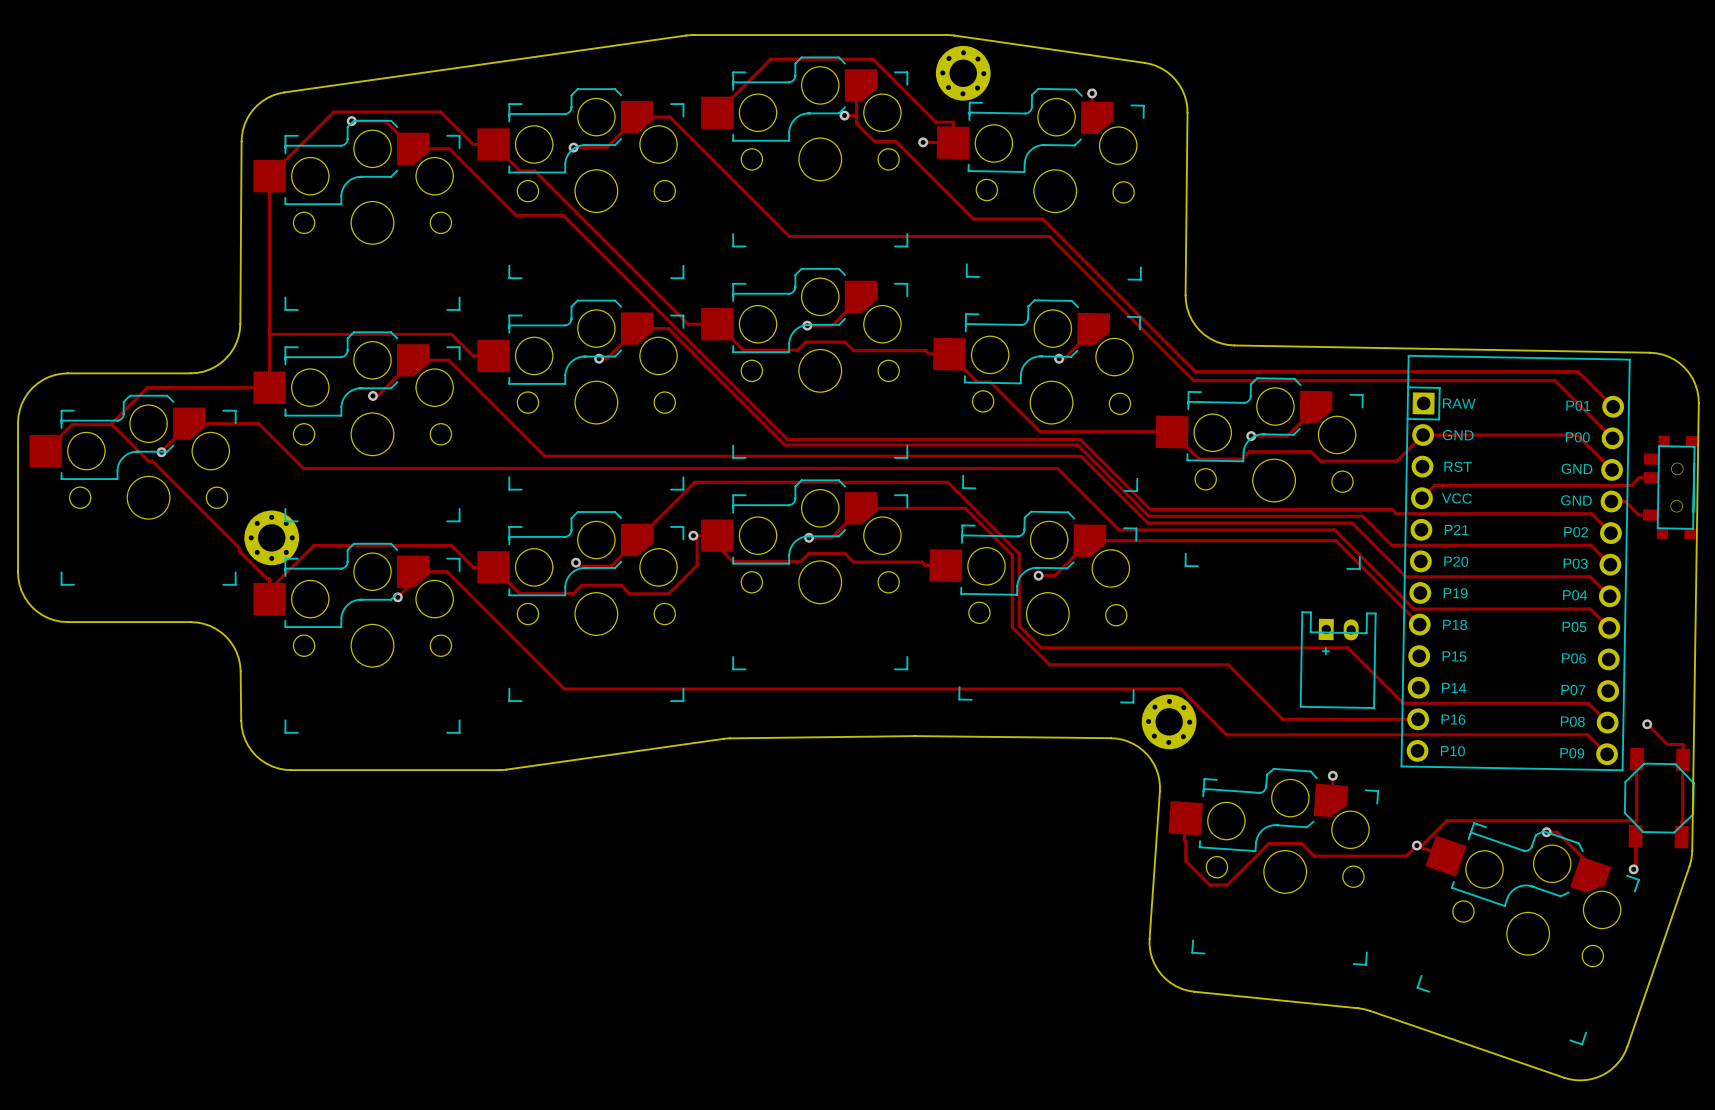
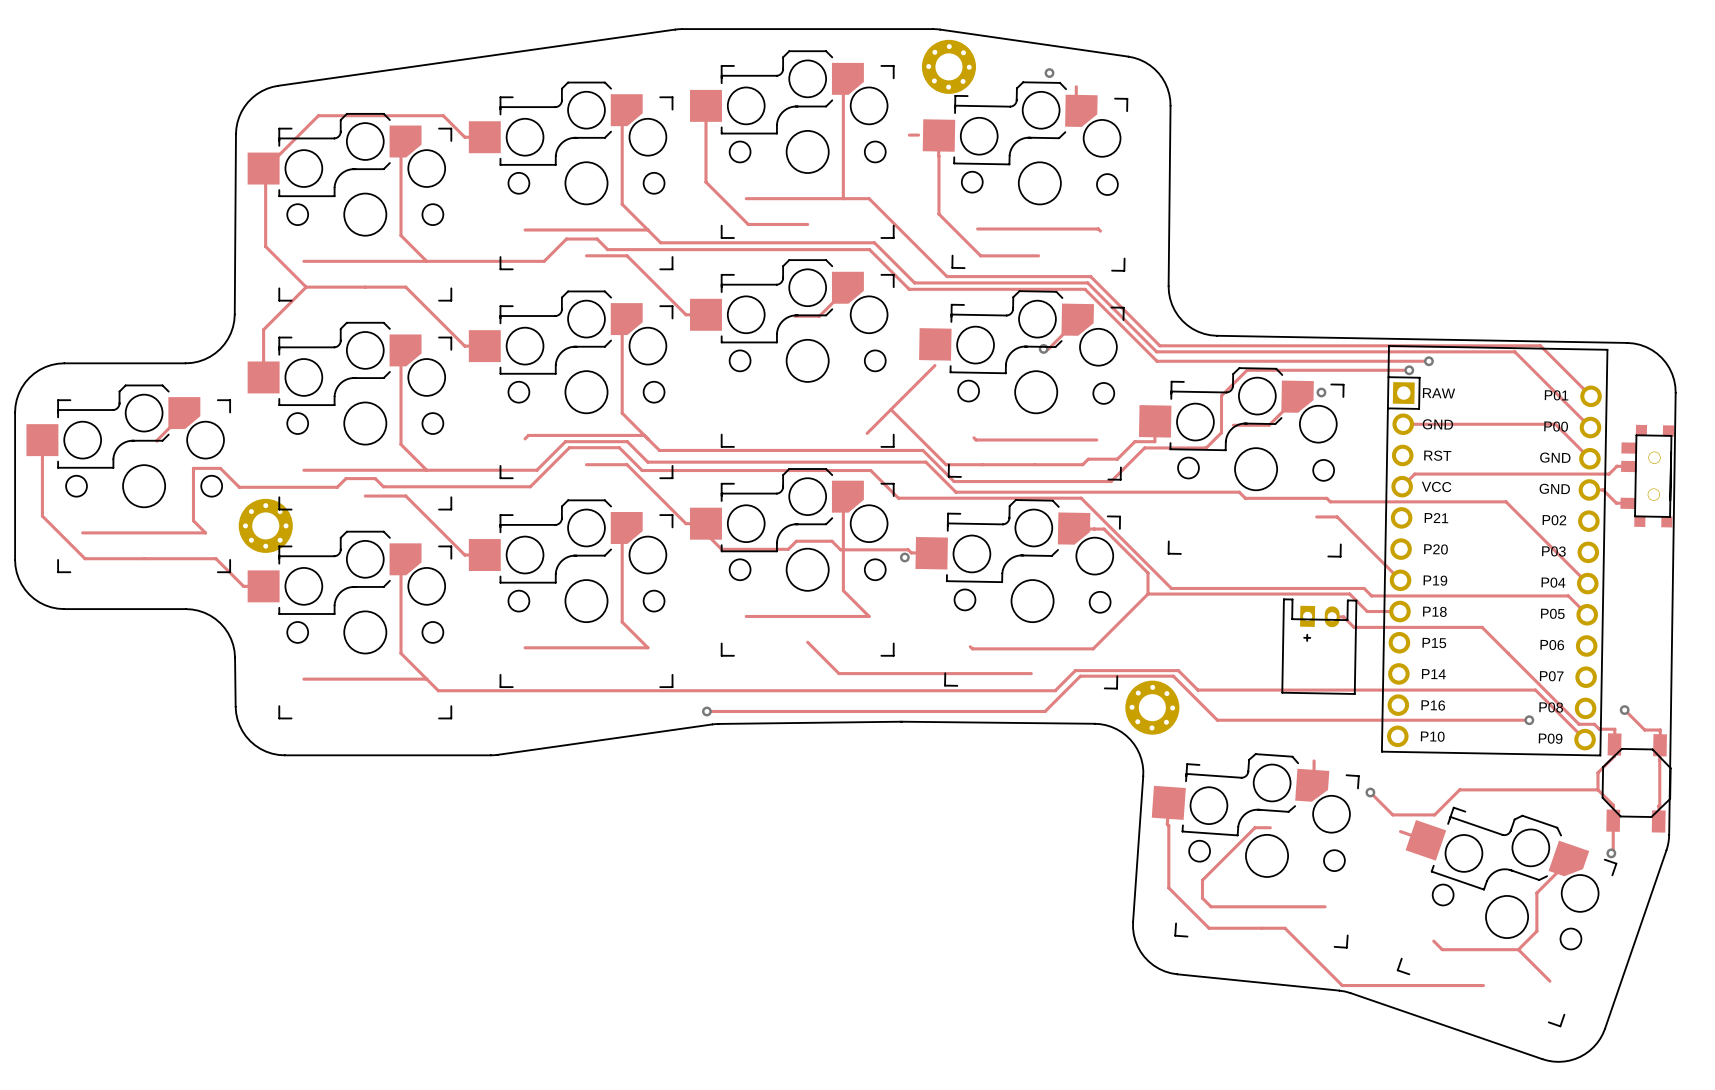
track: (856, 89) (856, 123) (874, 141) (895, 141) (973, 219) (1042, 219) (1195, 371) (1578, 371) -> (746, 198) (869, 198) (947, 276) (1090, 276) (1159, 345) (1540, 345) (1556, 361)
track: none -> (843, 83) (843, 198)
via position: (1092, 93) -> (1049, 73)
track: (717, 112) (770, 59) (873, 59) (936, 122) (953, 122) (953, 142) (932, 142) -> (705, 105) (705, 182) (748, 224) (807, 224)
track: (844, 115) (856, 115) -> none
via: (844, 115) -> none
track: (637, 117) (670, 117) (789, 236) (1049, 236) (1193, 380) (1554, 380) -> (622, 114) (622, 204) (660, 242) (874, 242) (914, 282) (1087, 282) (1156, 351) (1514, 351) (1533, 370)
track: (351, 121) (385, 121) (413, 148) (449, 148) (515, 215) (563, 215) (787, 439) (1080, 439) (1150, 509) (1391, 509) (1396, 513) (1591, 513) (1610, 533) -> none
via: (351, 121) -> none
track: (632, 121) (606, 147) (573, 147) -> none
track: (451, 122) (440, 112) (333, 112) (269, 176) (269, 339) -> (443, 115) (318, 115) (265, 168) (265, 246) (306, 287)
via: (923, 142) -> none
track: none -> (938, 135) (938, 214) (980, 255) (1038, 255)
track: (493, 144) (519, 170) (534, 170) (688, 324) (697, 324) -> (586, 255) (627, 255) (686, 314)
via: (573, 147) -> none
track: none -> (405, 141) (401, 146) (401, 235) (426, 261)
track: none -> (977, 228) (1098, 228) (1100, 231)
track: none -> (525, 230) (647, 230)
track: none -> (303, 261) (544, 261) (566, 239) (597, 239) (607, 249) (869, 249) (909, 289) (1085, 289) (1157, 361) (1428, 361)
track: none -> (306, 287) (263, 329)
track: (717, 324) (743, 350) (797, 350) (805, 342) (845, 342) (853, 350) (925, 350) (928, 353) (949, 354) (977, 382) (990, 382) (1039, 431) (1172, 432) (1198, 459) -> (622, 323) (622, 413) (659, 450) (922, 450) (954, 481) (1111, 481) (1144, 447) (1181, 447)
via: (807, 325) -> none
track: (637, 328) (668, 328) (784, 445) (1077, 445) (1149, 516) (1362, 516) (1391, 545) (1591, 545) (1610, 564) -> none
track: (632, 333) (606, 358) (599, 358) -> none
track: (269, 334) (451, 334) -> (306, 287) (405, 287) (443, 324)
via: (599, 358) -> none
track: (413, 360) (448, 360) (544, 456) (1081, 456) (1147, 523) (1352, 523) (1405, 576) (1590, 576) -> (303, 470) (536, 470) (565, 441) (627, 441) (647, 462) (925, 462) (955, 492) (1239, 492) (1245, 498) (1326, 498) (1330, 501) (1506, 501) (1568, 564)
track: (408, 364) (377, 395) (372, 395) -> (401, 354) (401, 444) (426, 470)
via: none -> (1428, 361)
track: none -> (934, 365) (867, 433)
via: none -> (1409, 370)
track: (269, 387) (147, 387) (112, 424) -> none
via: (372, 395) -> none
via: none -> (1321, 392)
track: none -> (890, 409) (946, 464) (1082, 464) (1088, 459) (1117, 459) (1134, 441) (1154, 441) (1155, 421)
track: (189, 423) (258, 423) (303, 468) (1057, 468) (1118, 529) (1334, 529) (1413, 609) (1590, 609) -> (82, 532) (205, 532) (193, 520) (193, 468) (220, 468) (239, 487) (337, 487) (345, 478) (375, 478) (383, 486) (530, 486) (569, 447) (619, 447) (642, 470) (870, 470) (898, 498) (1081, 498) (1171, 588) (1364, 588) (1371, 595) (1568, 596)
track: (112, 424) (148, 461) (152, 461) (239, 548) (239, 551) (267, 578) (269, 578) (269, 599) -> (42, 440) (42, 516) (85, 558) (215, 558) (243, 586) (263, 586)
track: (112, 424) (72, 424) (45, 451) -> none
track: (1423, 435) (1397, 461) (1320, 461) (1311, 451) (1249, 451) (1241, 459) (1223, 459) -> (1409, 370) (1247, 370) (1221, 395) (1221, 432) (1206, 447)
via: (1251, 436) -> none
track: none -> (644, 435) (528, 435) (525, 438)
track: none -> (973, 437) (976, 439) (1096, 439)
via: (161, 452) -> none
track: none -> (586, 464) (627, 464) (686, 523)
track: (860, 508) (965, 508) (1012, 555) (1012, 627) (1049, 664) (1228, 664) (1282, 719) (1418, 719) -> none
track: (856, 512) (831, 537) (809, 537) -> (843, 501) (843, 590) (869, 616) (746, 616)
track: none -> (1316, 516) (1337, 516) (1400, 580)
track: (693, 535) (697, 535) (697, 565) (668, 593) (629, 593) (621, 585) (581, 585) (573, 593) (519, 593) (493, 567) -> none
via: (693, 535) -> none
via: (809, 537) -> none
track: (637, 540) (694, 482) (947, 482) (1019, 553) (1019, 625) (1041, 647) (1347, 647) (1403, 703) (1588, 703) (1607, 722) -> none
track: none -> (1074, 528) (1104, 529) (1148, 573) (1148, 594)
track: (632, 544) (611, 566) (579, 566) (576, 562) -> (622, 532) (622, 622) (647, 647) (525, 647)
track: (451, 545) (313, 545) (269, 589) -> (443, 533) (405, 496) (365, 496)
via: (576, 562) -> none
via: none -> (904, 557)
track: (1038, 575) (1054, 575) (1089, 540) (1335, 540) (1419, 624) -> (1148, 594) (1349, 594) (1367, 611) (1399, 611)
via: (1038, 575) -> none
track: (397, 597) (413, 581) (413, 571) (447, 571) (564, 689) (1180, 689) (1226, 734) (1587, 734) -> (405, 559) (401, 563) (401, 653) (438, 690) (1055, 690) (1075, 670) (1178, 670) (1197, 690) (1535, 690) (1565, 720)
via: (397, 597) -> none
track: none -> (1148, 594) (1093, 648) (972, 648) (970, 646)
track: none -> (1332, 616) (1343, 616) (1354, 627) (1482, 627) (1579, 724) (1594, 724) (1599, 729) (1614, 729) (1614, 756) (1597, 772) (1597, 789)
track: none -> (807, 642) (839, 673) (1031, 673)
track: none -> (303, 679) (426, 679)
track: none -> (706, 711) (1045, 711) (1080, 676) (1173, 676) (1217, 720) (1529, 720)
via: none -> (706, 711)
via: none -> (1529, 720)
track: (1636, 759) (1635, 820) (1446, 820) (1420, 847) (1416, 845) (1406, 856) (1314, 856) (1301, 843) (1288, 843) -> none
via: (1332, 775) -> none
track: none -> (1597, 789) (1459, 789) (1434, 814) (1392, 814) (1370, 792)
track: none -> (1597, 789) (1613, 805)
via: none -> (1370, 792)
track: (1546, 832) (1557, 832) (1590, 865) (1590, 877) -> (1518, 949) (1536, 931) (1536, 893) (1568, 860)
via: (1546, 832) -> none
track: (1272, 843) (1269, 843) (1227, 884) (1209, 884) (1185, 861) -> (1254, 827) (1202, 880) (1202, 898) (1211, 906) (1325, 906)
via: (1416, 845) -> none
track: none -> (1168, 845) (1168, 887) (1209, 928) (1284, 928) (1342, 985) (1483, 985)
track: none -> (1433, 941) (1442, 949) (1518, 949)
track: none -> (1518, 949) (1549, 981)

